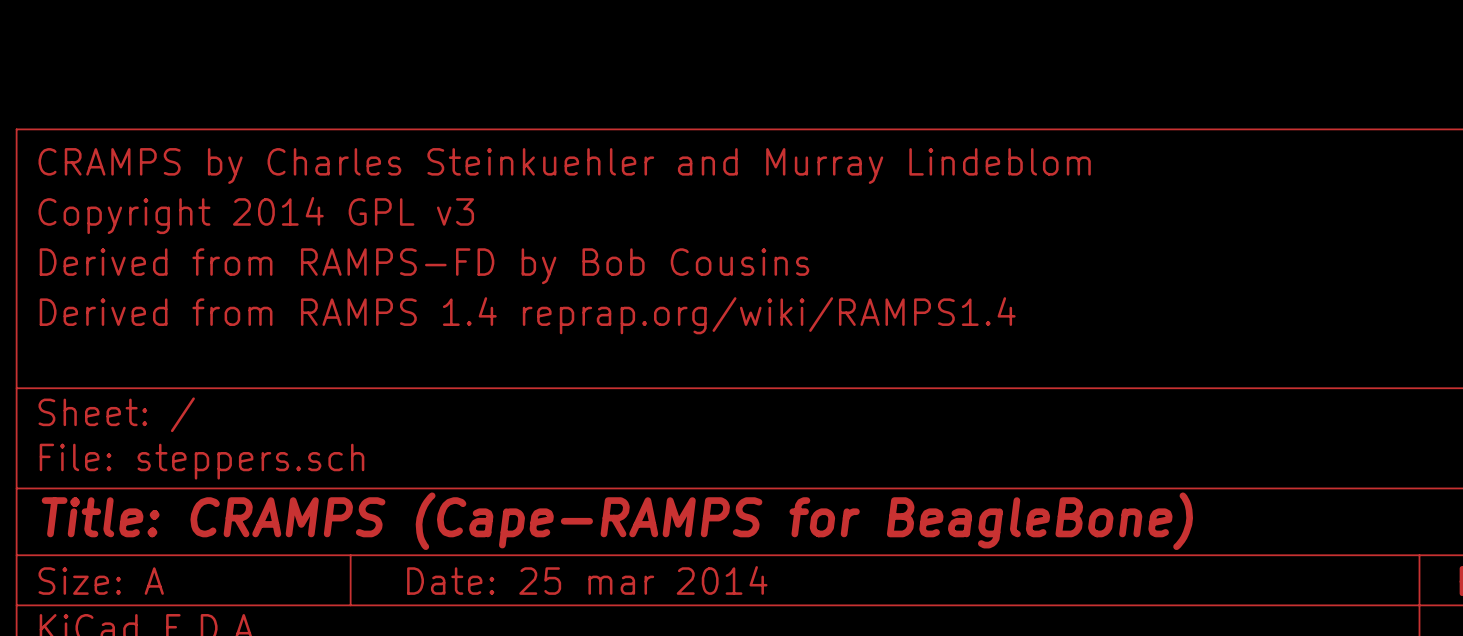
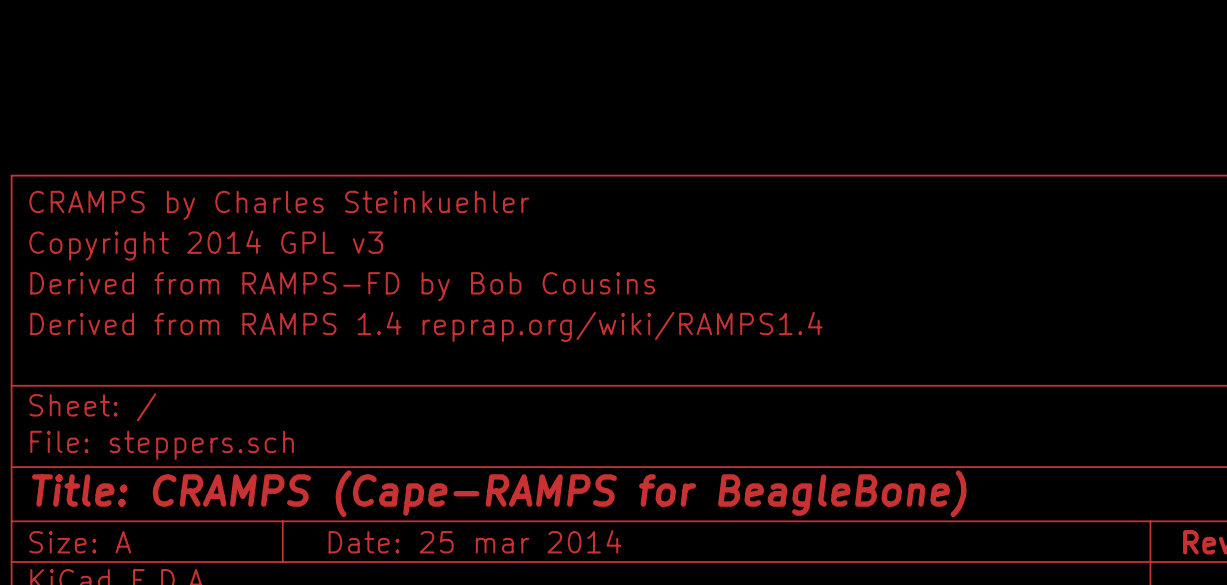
title block: CRAMPS by Charles Steinkuehler and Murray Lindeblom (564, 166) -> CRAMPS by Charles Steinkuehler (279, 205)

